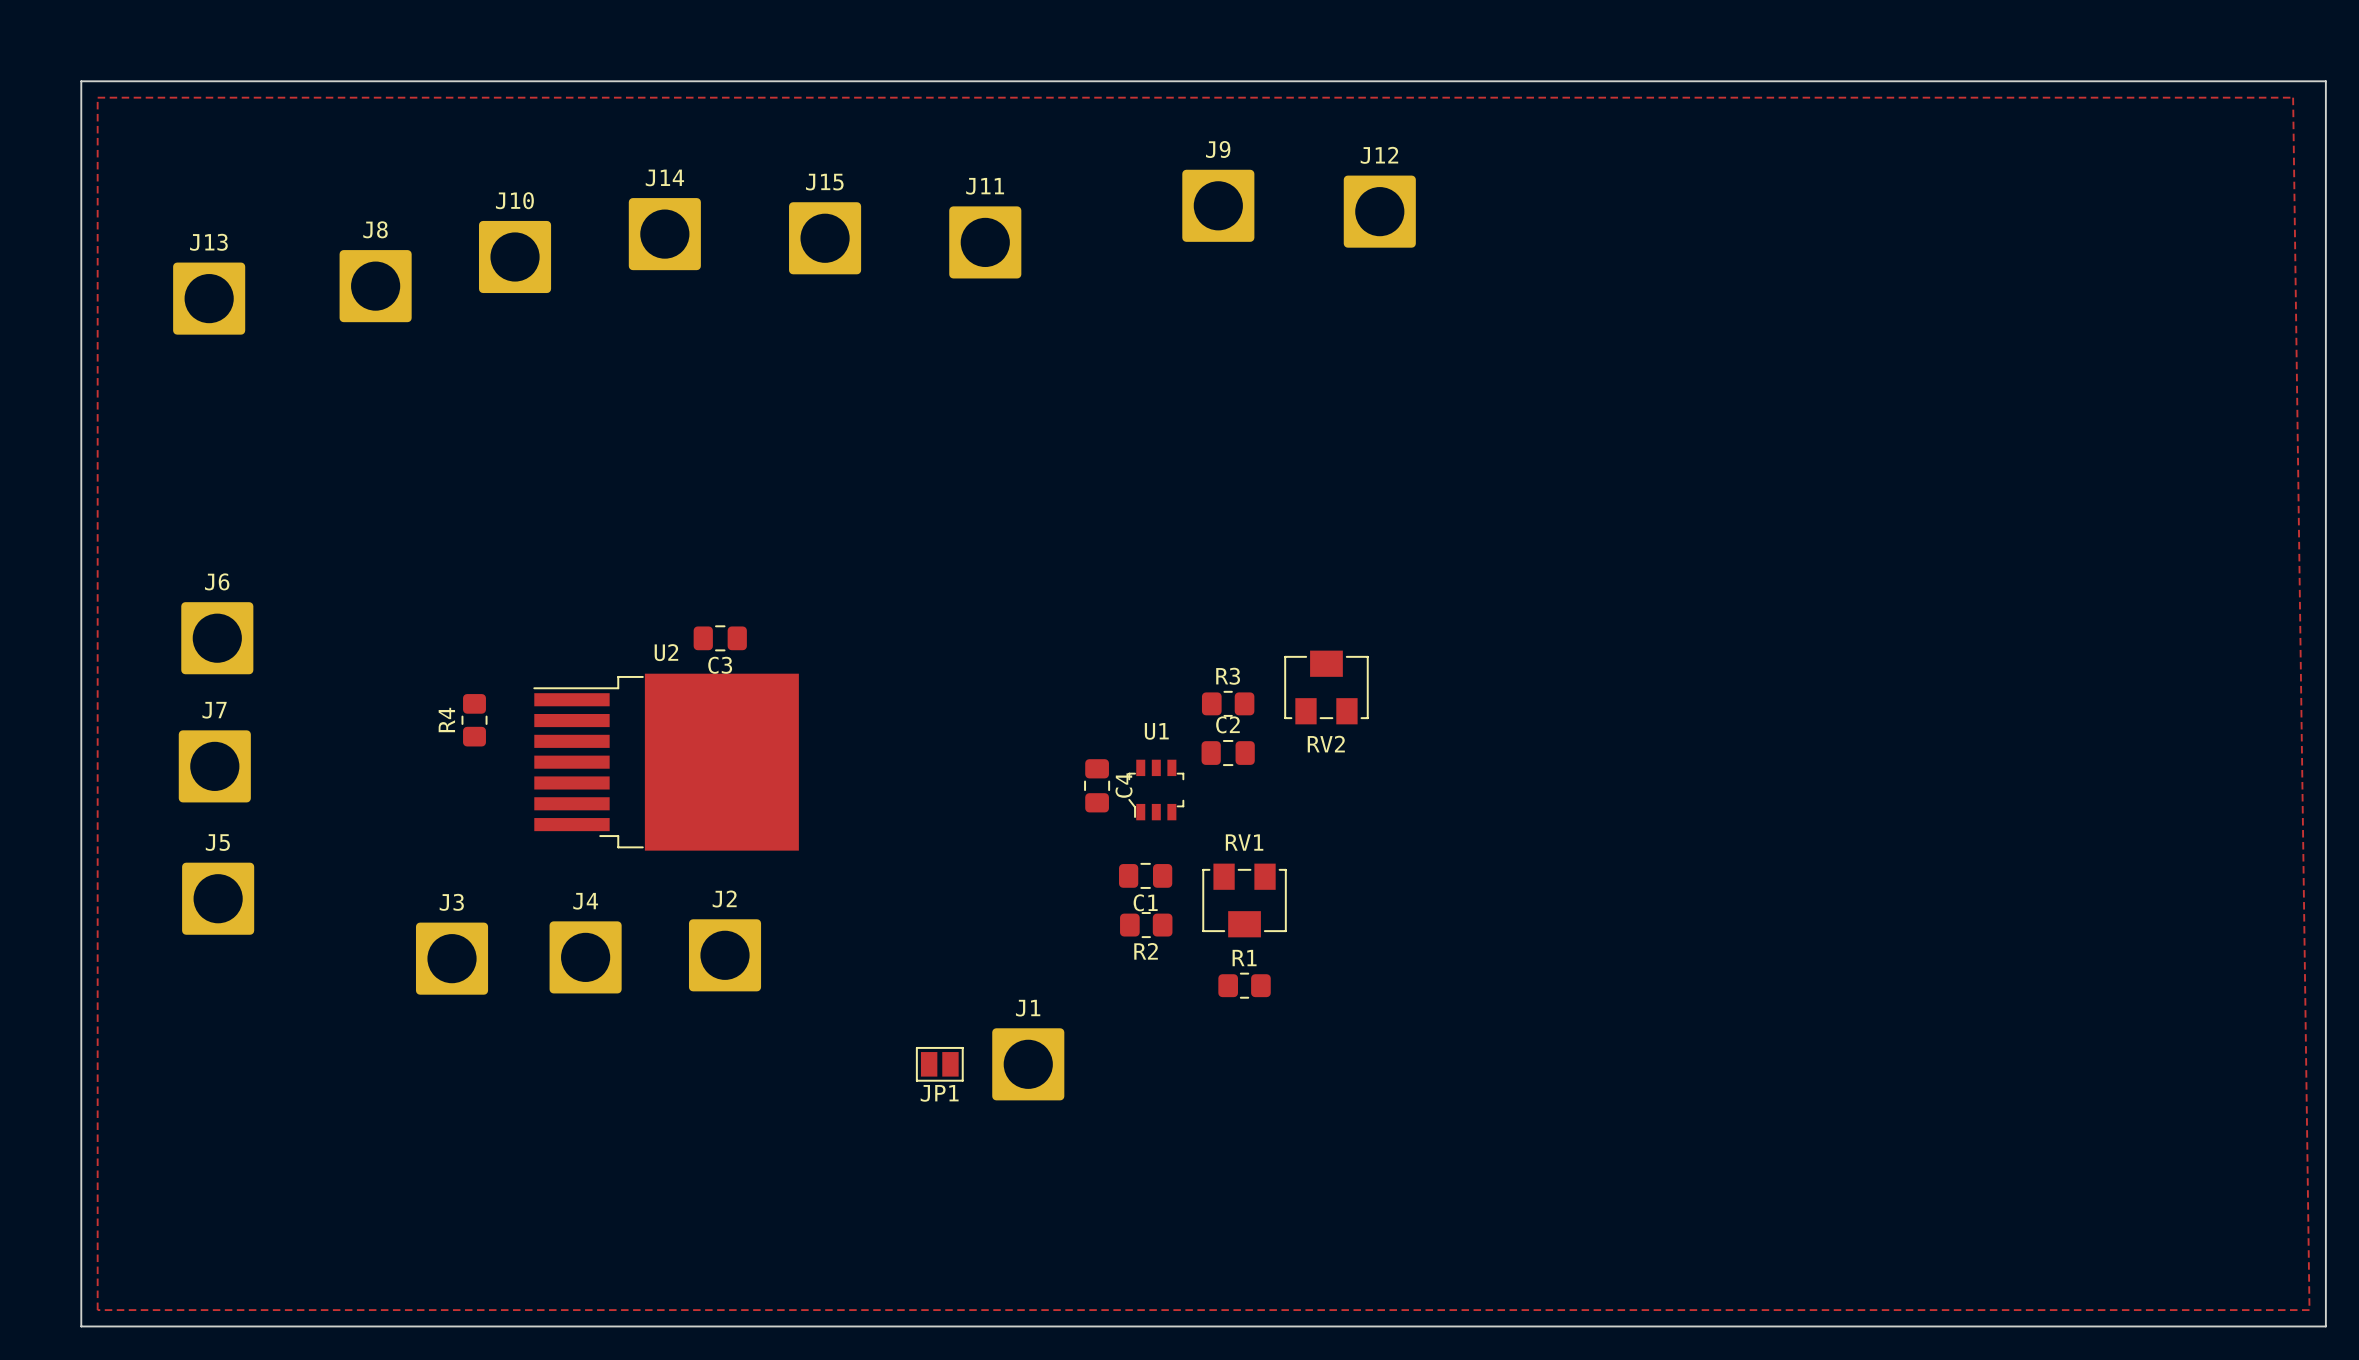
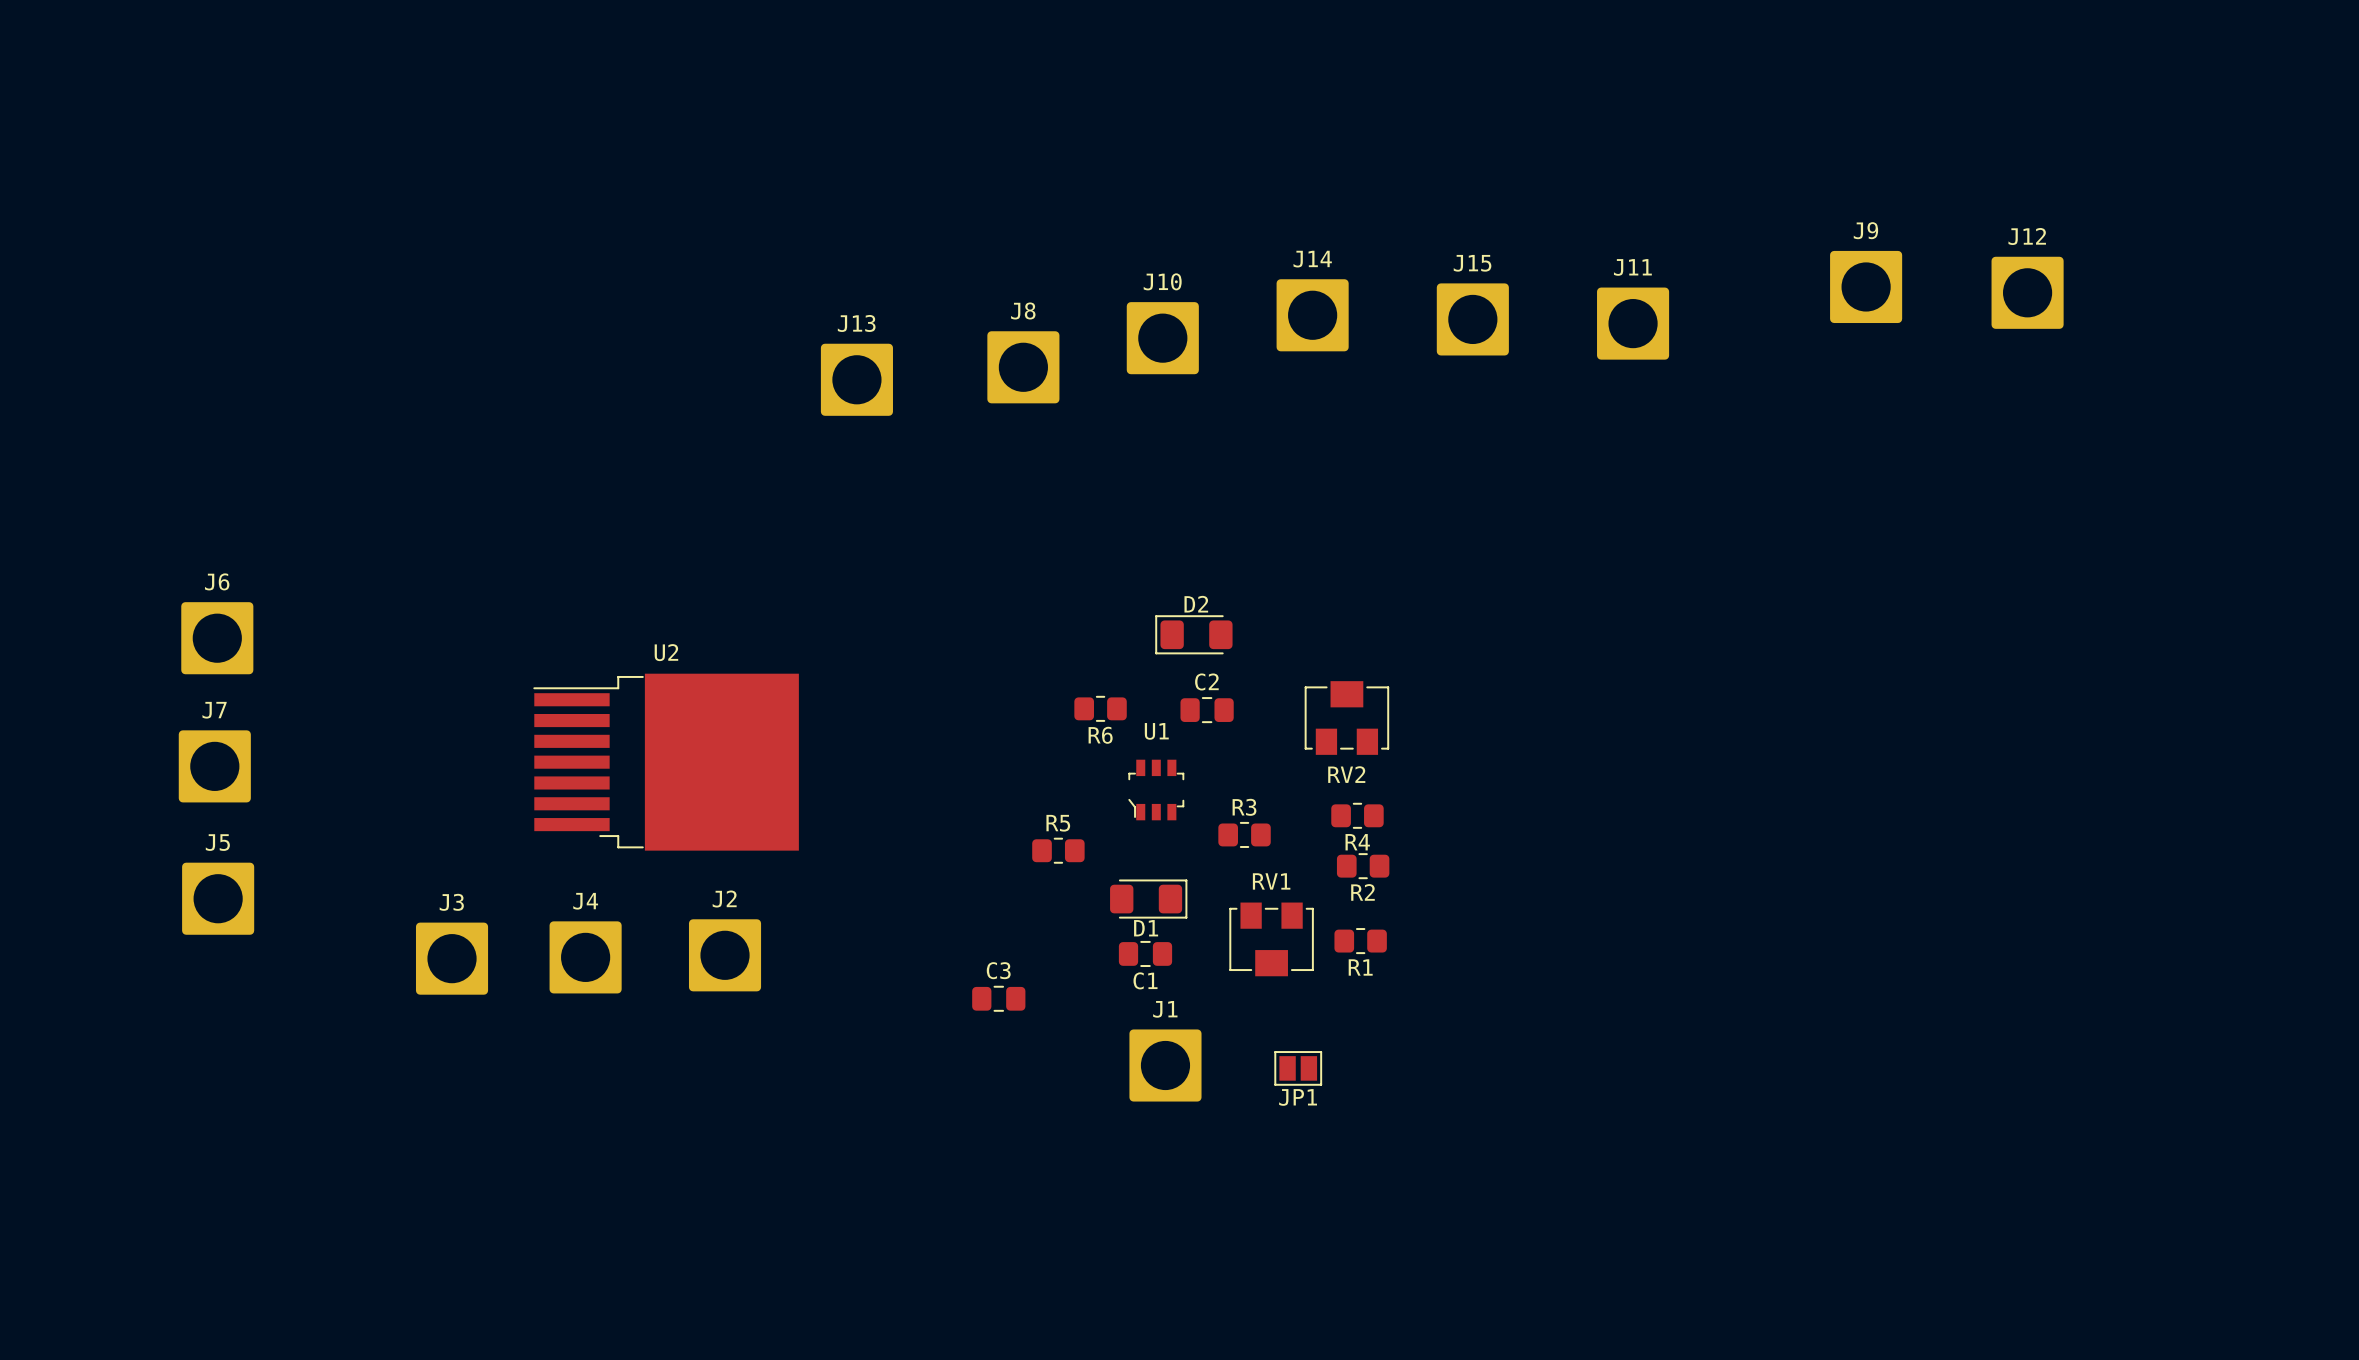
board edge: (81, 81) (81, 1326) (2325, 1326) (2325, 81) (81, 81) -> none
zone outline: (97, 97) (97, 1310) (2309, 1310) (2293, 97) (97, 97) -> none
J9 position: (1218, 205) -> (1866, 286)
J12 position: (1379, 211) -> (2027, 292)
J14 position: (664, 234) -> (1312, 315)
J15 position: (825, 238) -> (1472, 319)
J11 position: (985, 242) -> (1633, 323)
J10 position: (515, 256) -> (1162, 338)
J8 position: (375, 286) -> (1023, 367)
J13 position: (209, 298) -> (856, 379)
D2: none -> (1193, 634)
C3 position: (720, 638) -> (998, 998)
C3 name position: C3 (720, 665) -> C3 (998, 970)
RV2 position: (1326, 687) -> (1346, 718)
R3 position: (1228, 703) -> (1244, 834)
R6: none -> (1100, 708)
R4 name position: R4 (446, 720) -> R4 (1357, 842)
R4 rotation: 0° (474, 720) -> 90° clockwise (1357, 815)
R4 position: (474, 720) -> (1357, 815)
C2 position: (1228, 753) -> (1207, 710)
C4: (1097, 785) -> none
R5: none -> (1058, 850)
C1 position: (1145, 875) -> (1145, 953)
D1: none -> (1148, 899)
RV1 position: (1244, 900) -> (1271, 939)
R2 position: (1146, 925) -> (1363, 866)
R1 name position: R1 (1244, 958) -> R1 (1360, 967)
R1 position: (1244, 985) -> (1360, 941)
JP1 position: (939, 1064) -> (1298, 1068)
J1 position: (1028, 1064) -> (1165, 1065)

